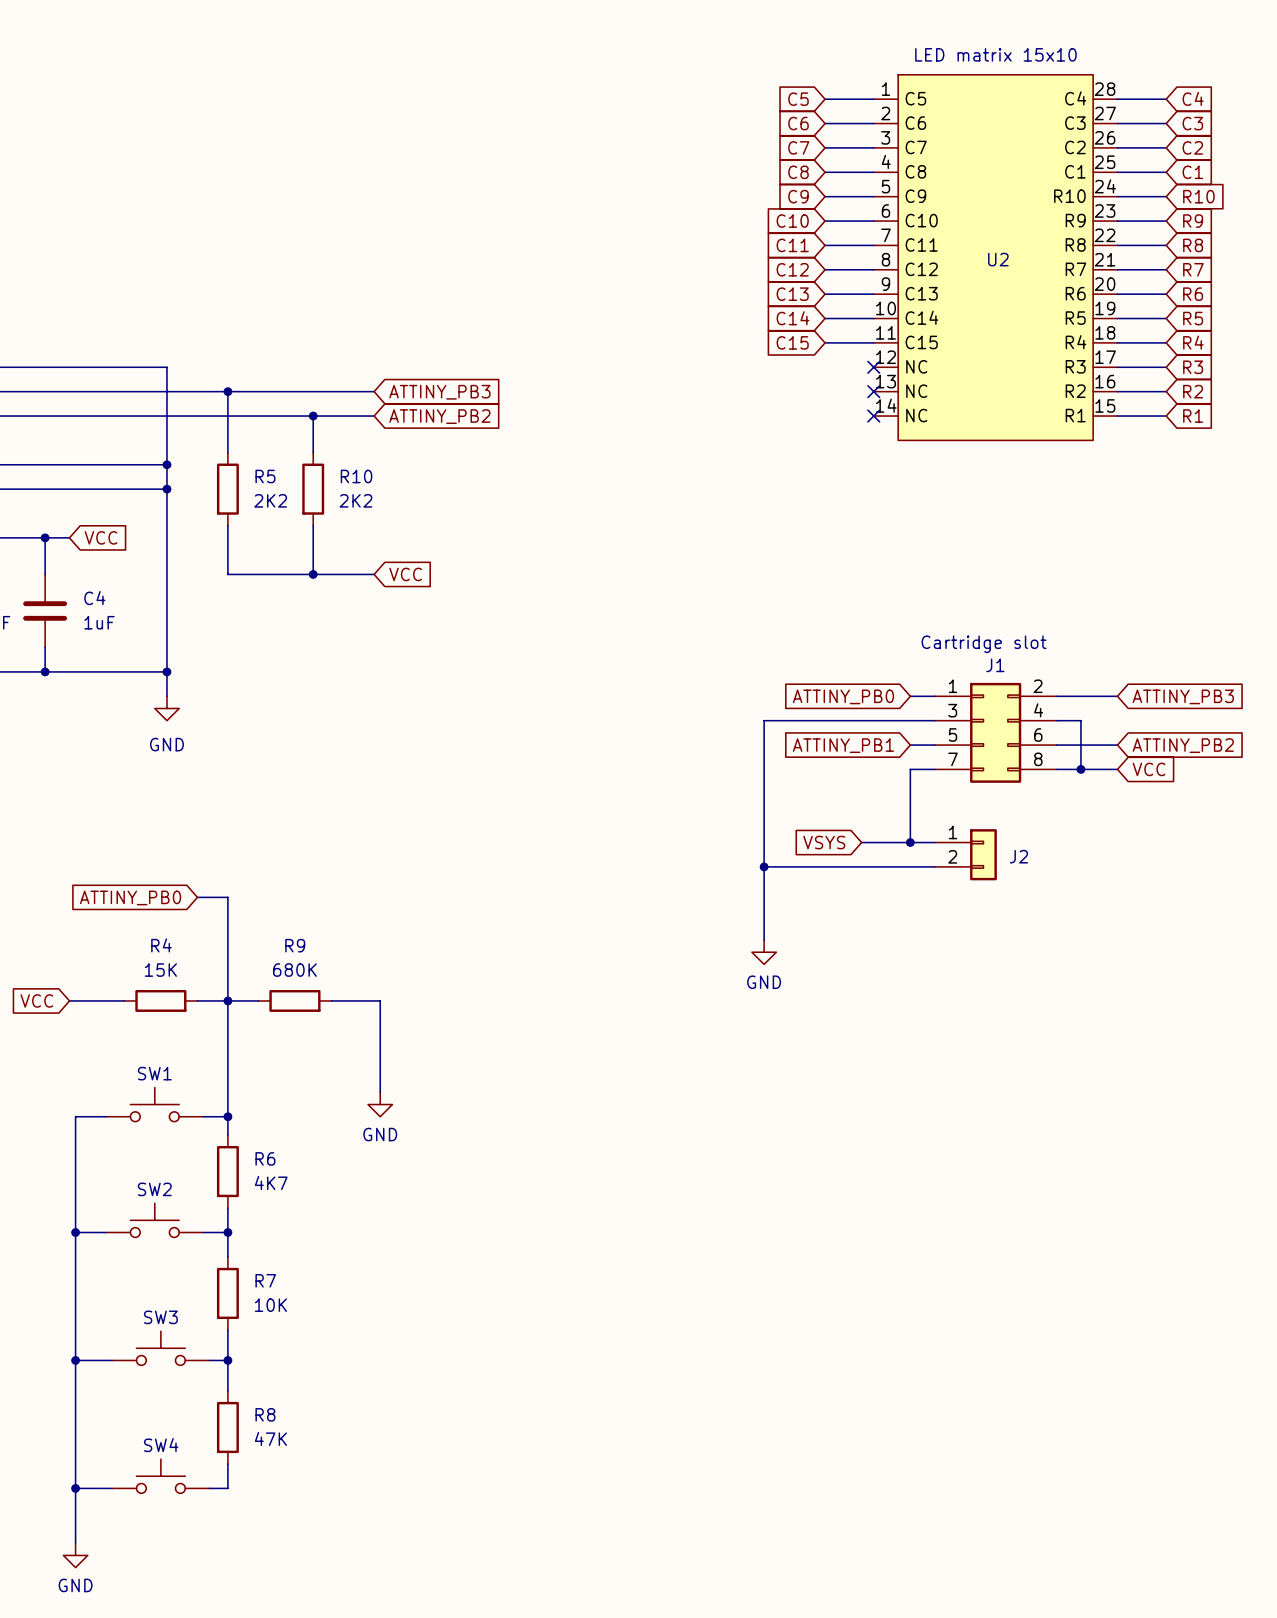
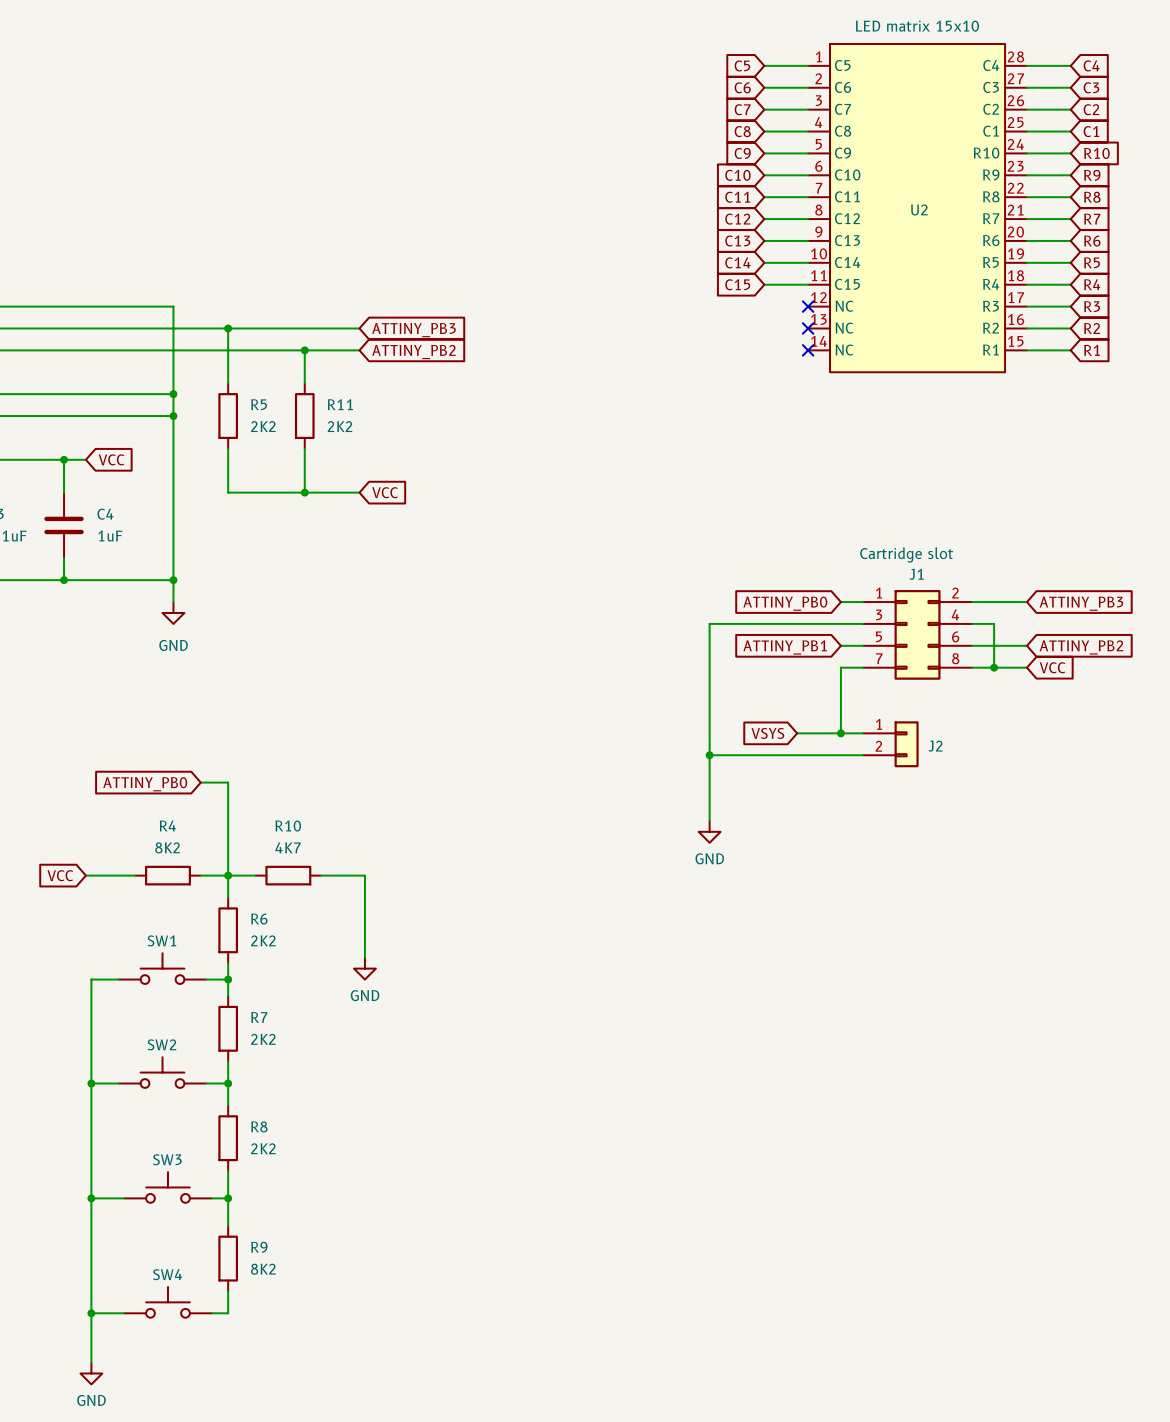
R10 name: R10 (356, 476) -> R11 (340, 404)
R9 name: R9 (295, 945) -> R10 (288, 826)
R4 value: 15K (160, 970) -> 8K2 (167, 847)
R9 value: 680K (294, 970) -> 4K7 (287, 847)
wire: (227, 1025) (227, 1098) -> none
R6: none -> 2K2 (228, 930)
R6 name: R6 (265, 1158) -> R7 (259, 1017)
R6 value: 4K7 (271, 1183) -> 2K2 (263, 1039)
R7 name: R7 (265, 1280) -> R8 (259, 1126)
R7 value: 10K (270, 1305) -> 2K2 (263, 1148)
R8 name: R8 (265, 1414) -> R9 (259, 1247)
R8 value: 47K (270, 1438) -> 8K2 (263, 1269)

